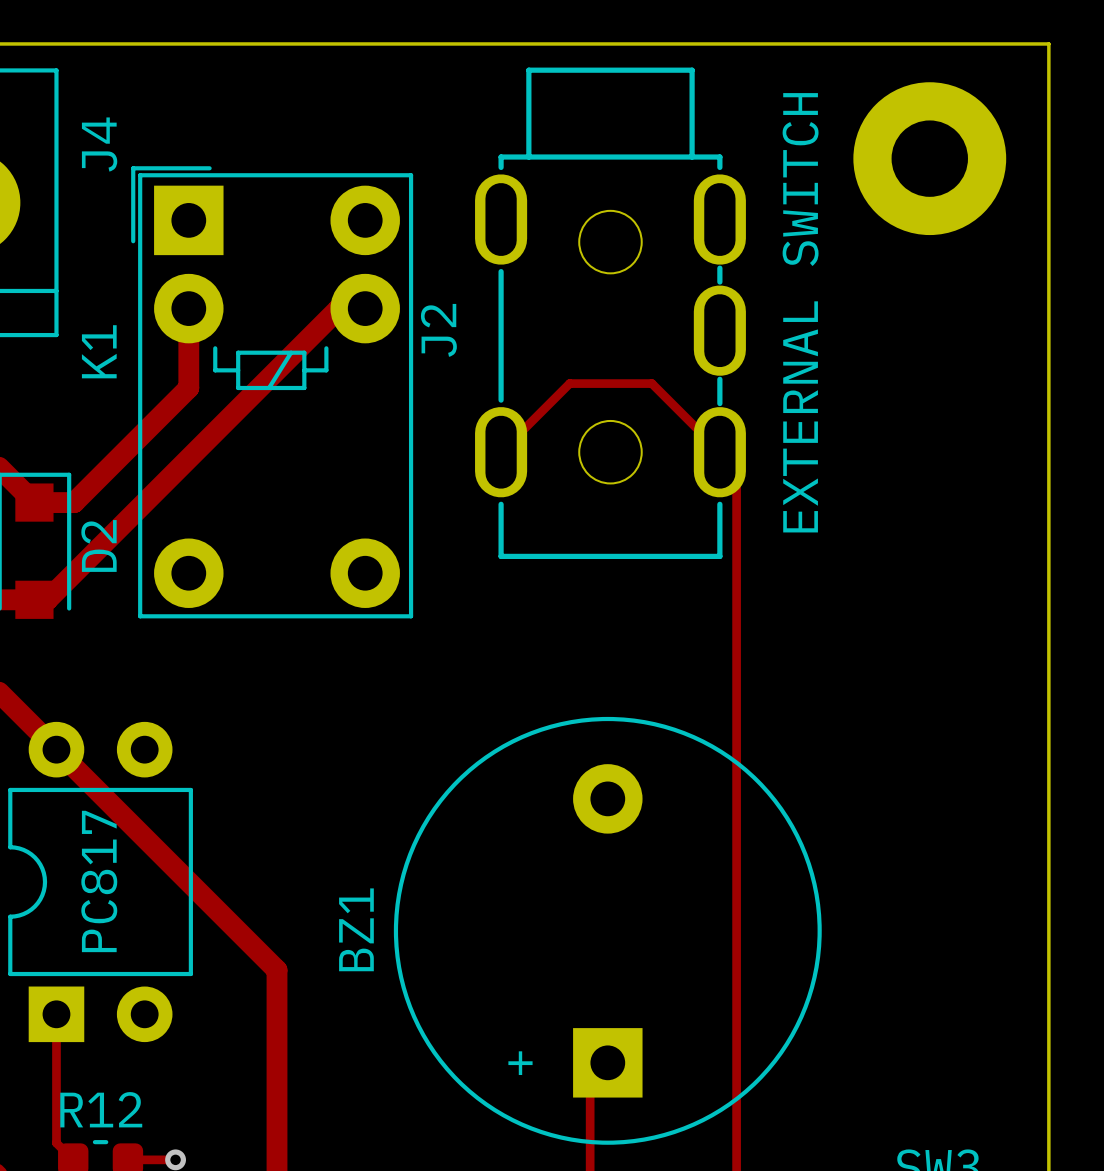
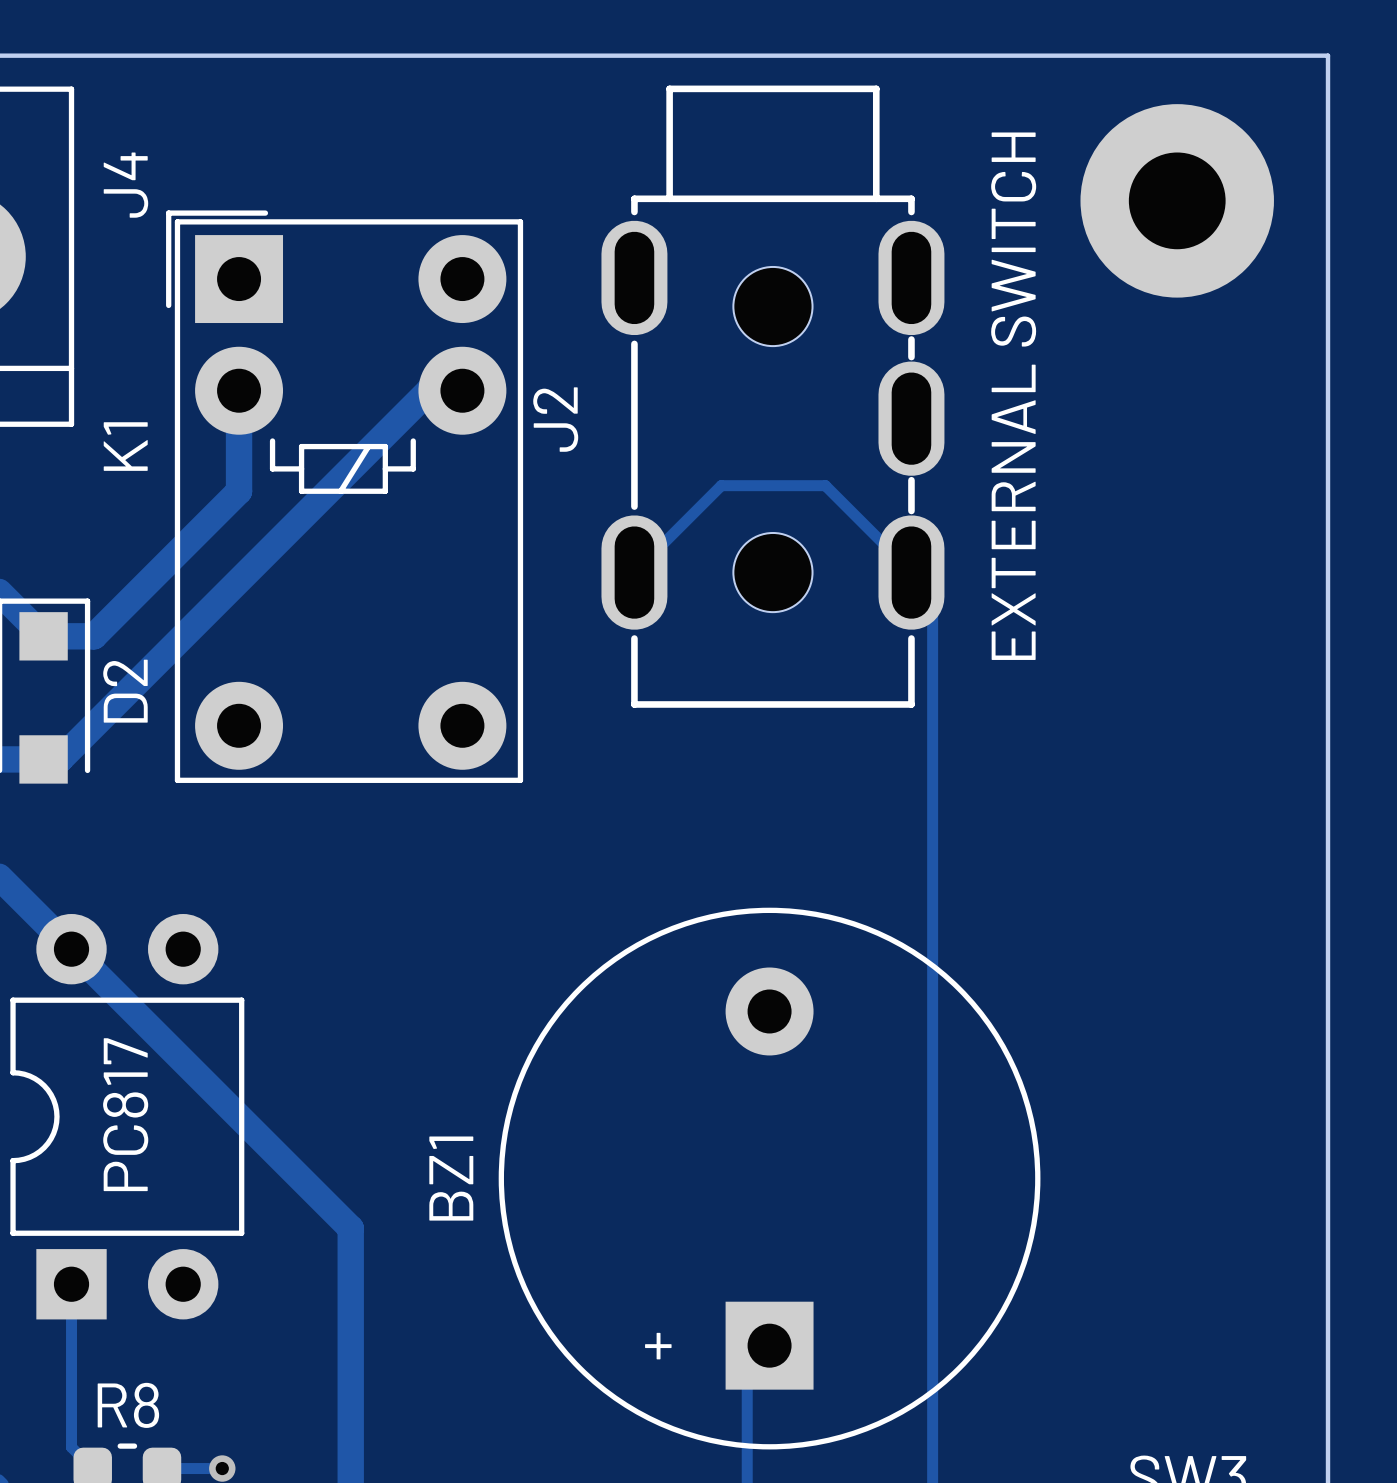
R12 name: R12 (101, 1109) -> R8 (128, 1405)

